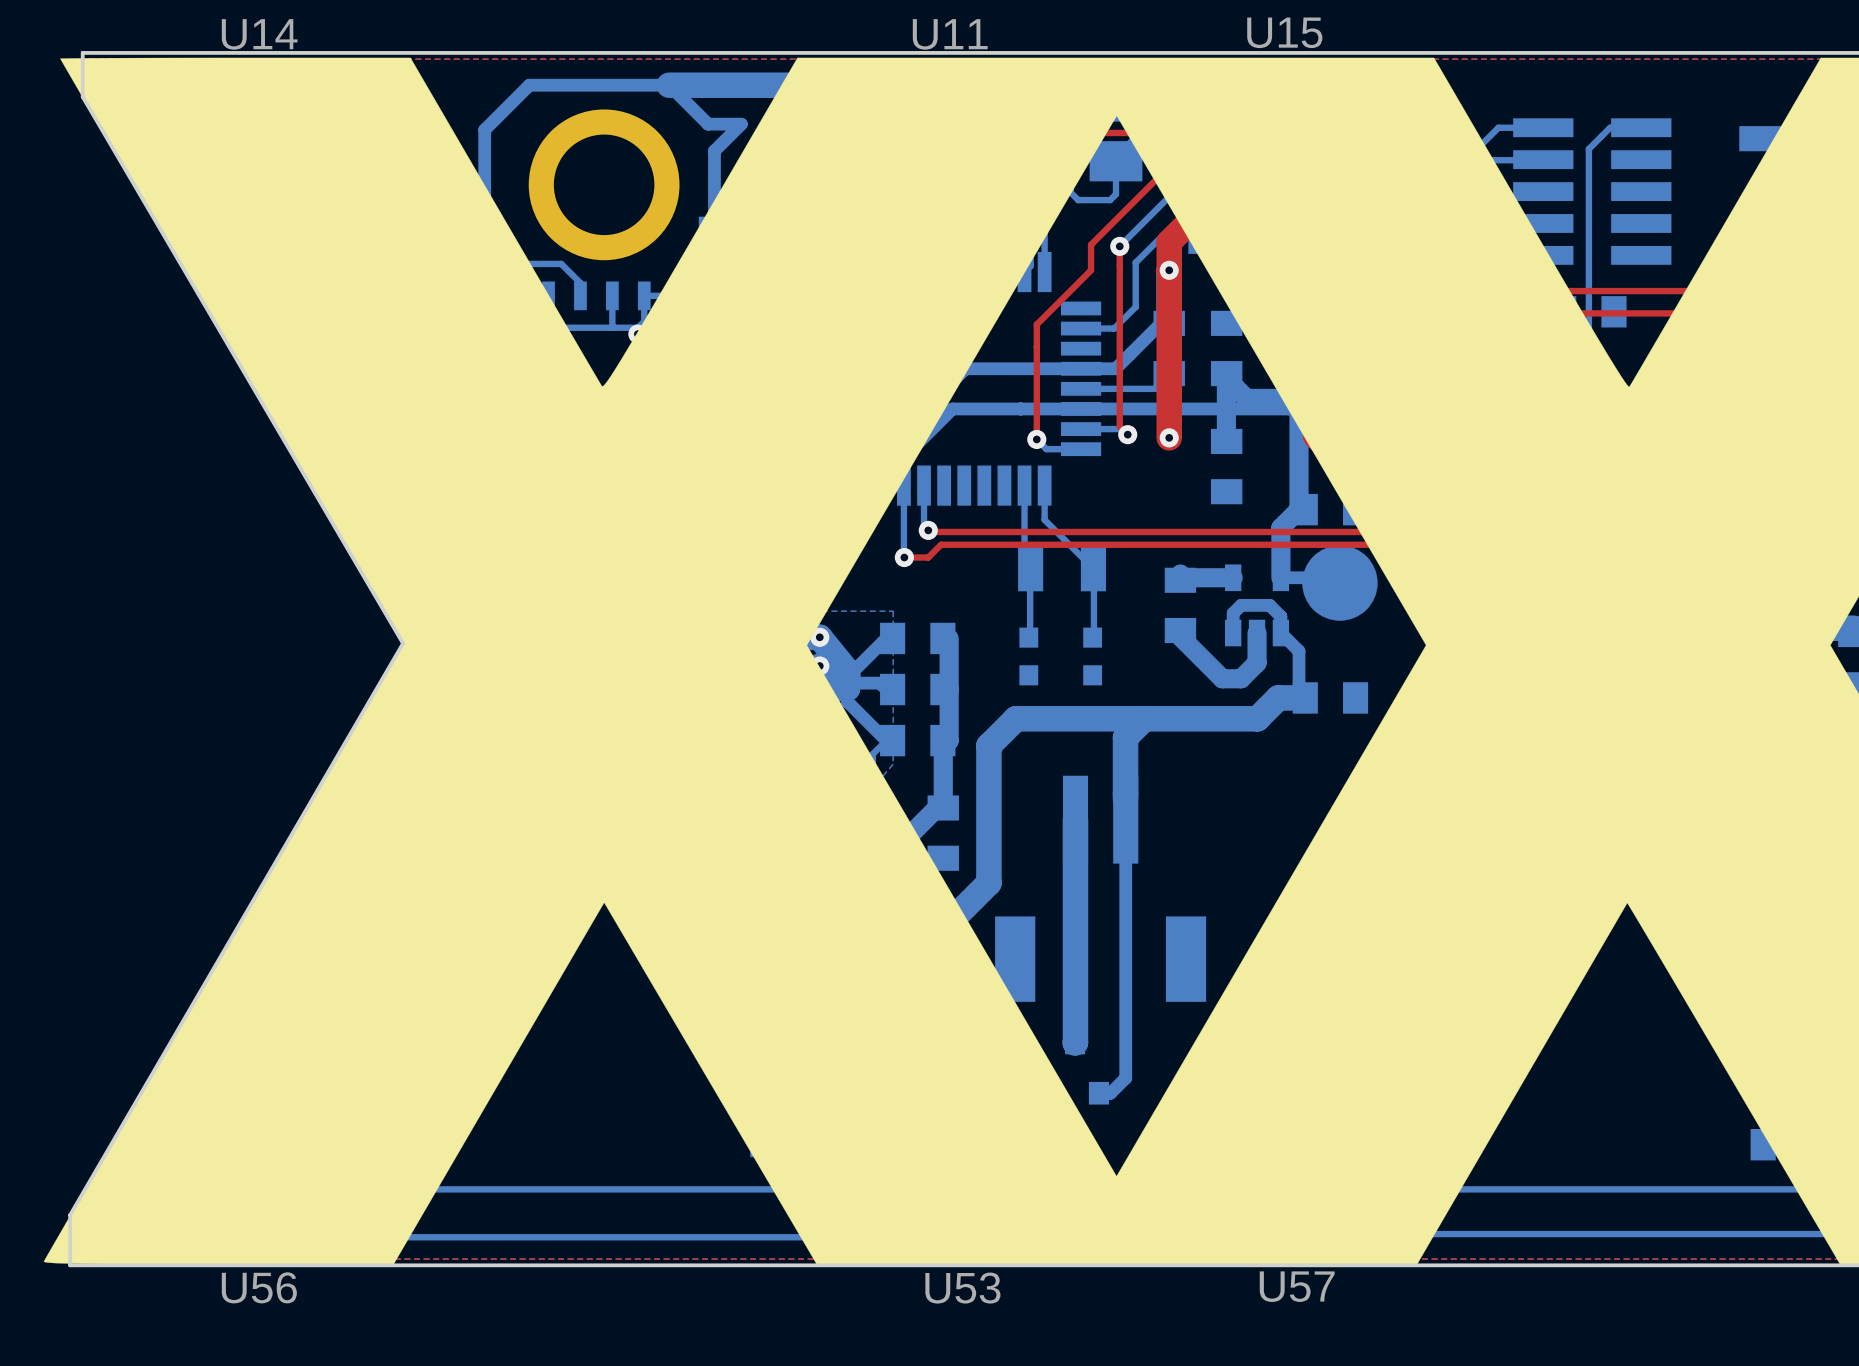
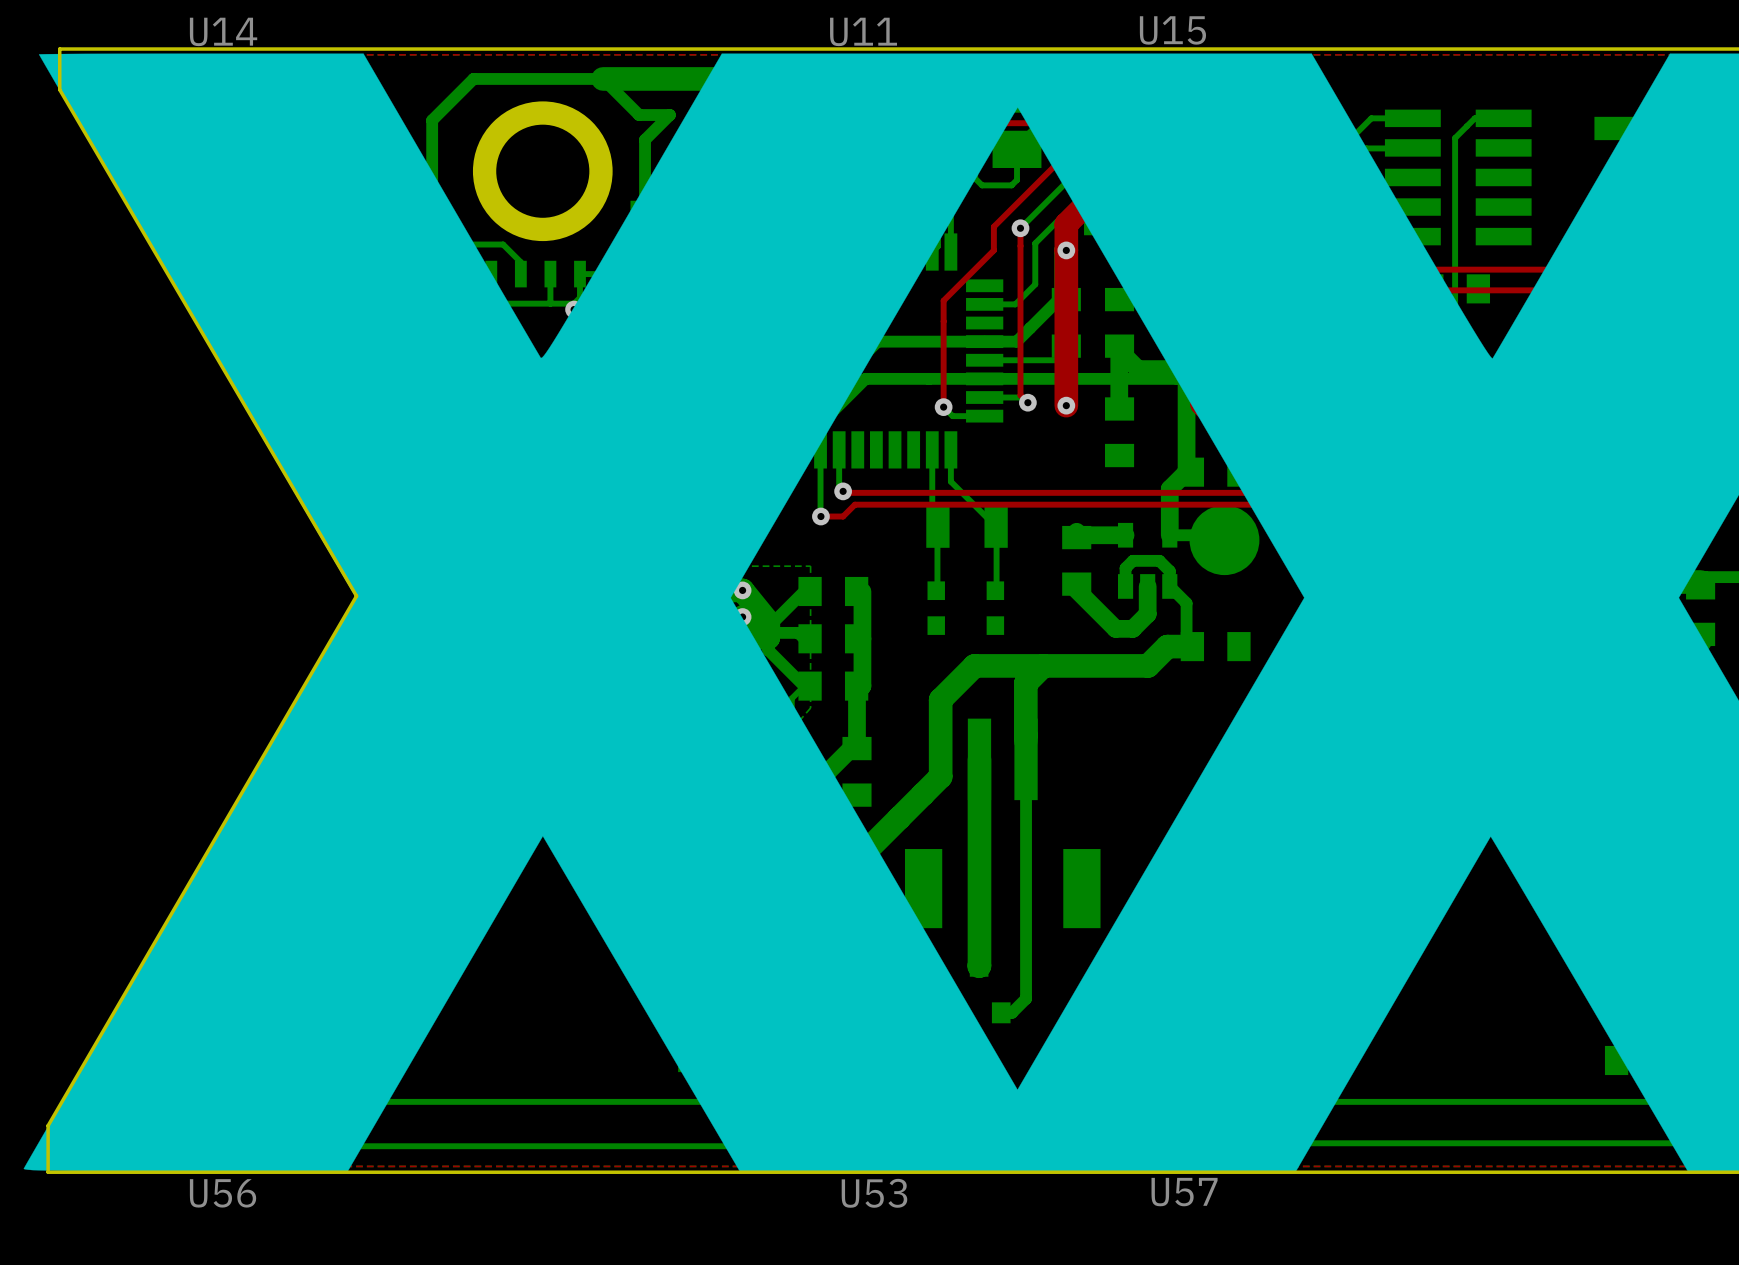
bottom track: (1070, 718) (1015, 718) (988, 745) (988, 883) -> (974, 665) (940, 699) (940, 776) (899, 818)

